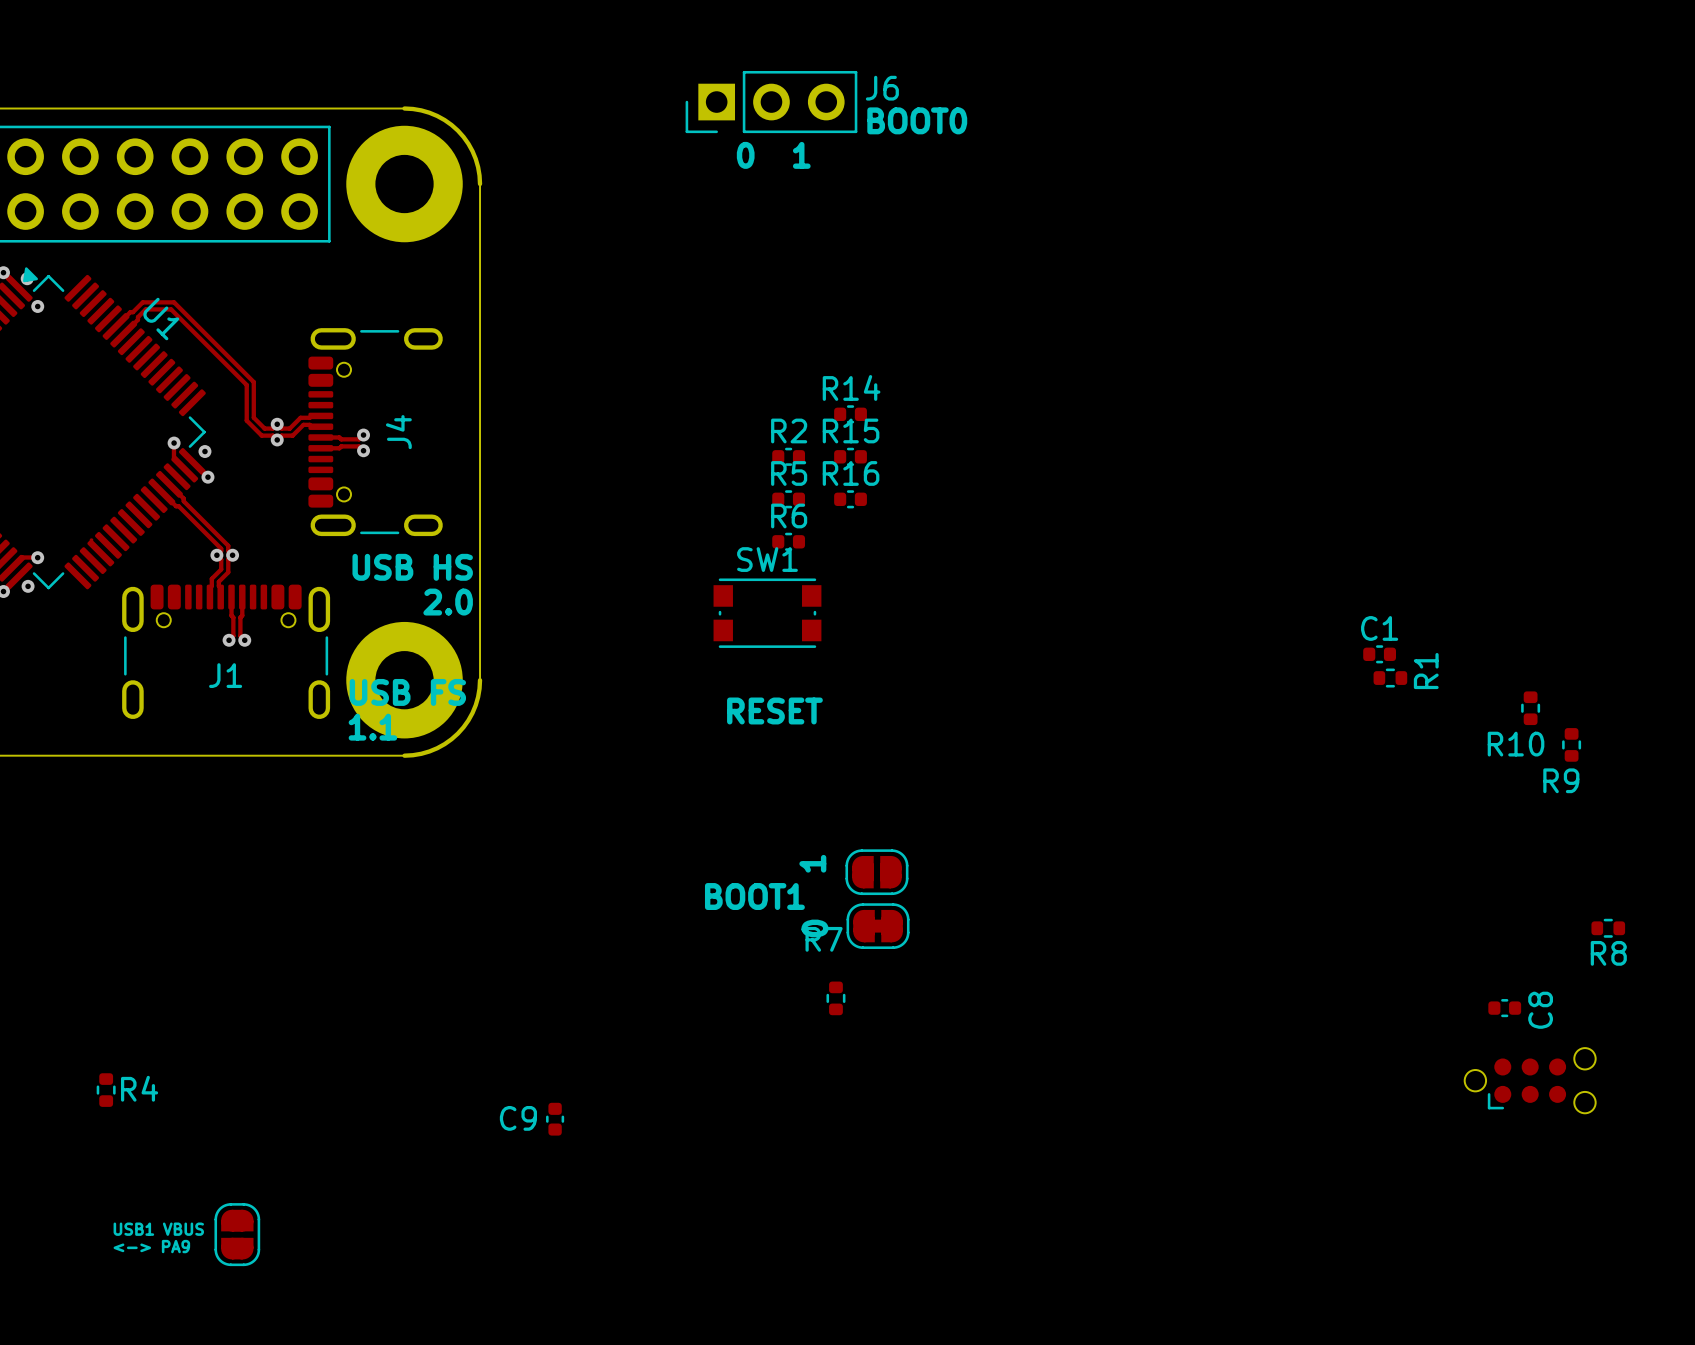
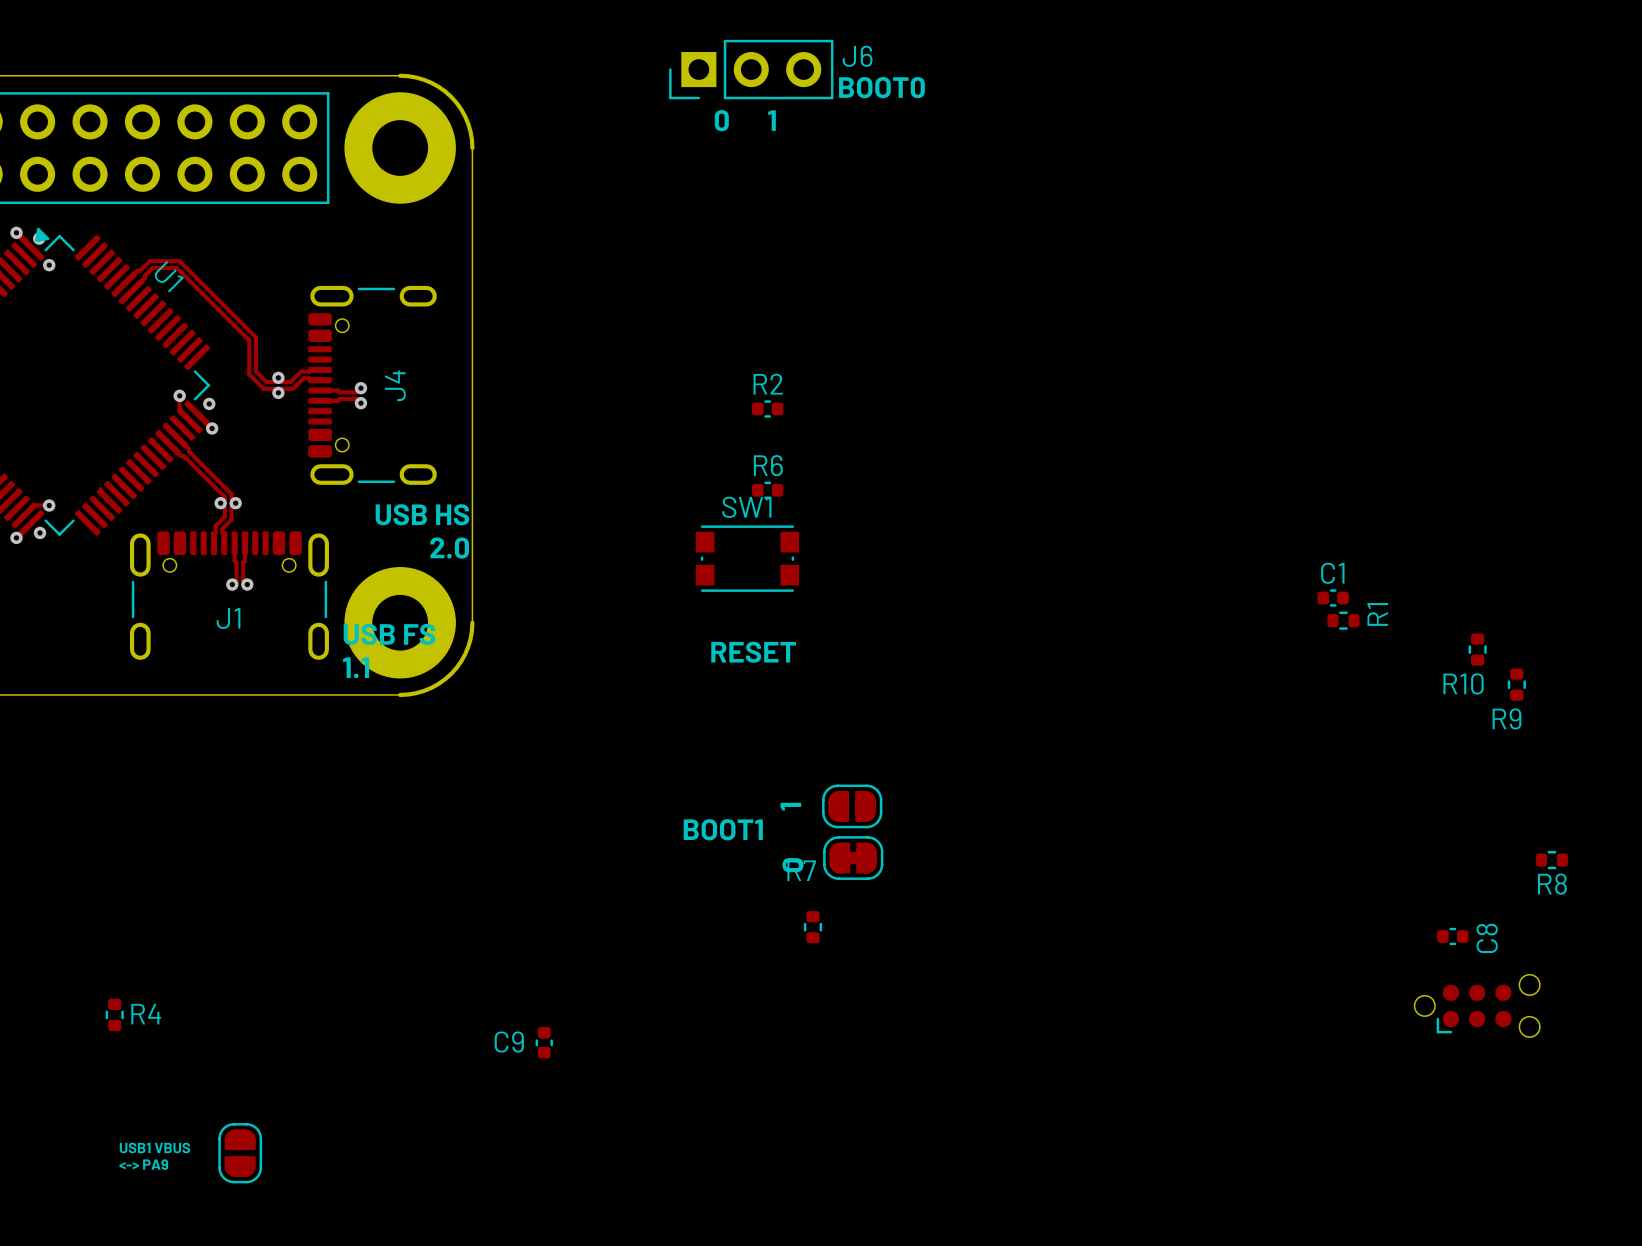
R14: (850, 414) -> none
R15: (850, 456) -> none
R5: (788, 499) -> none
R16: (850, 499) -> none

